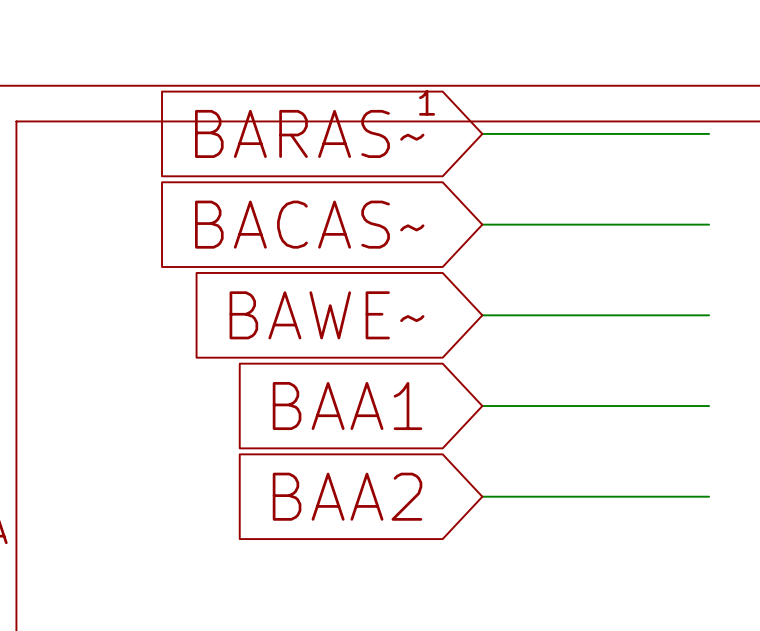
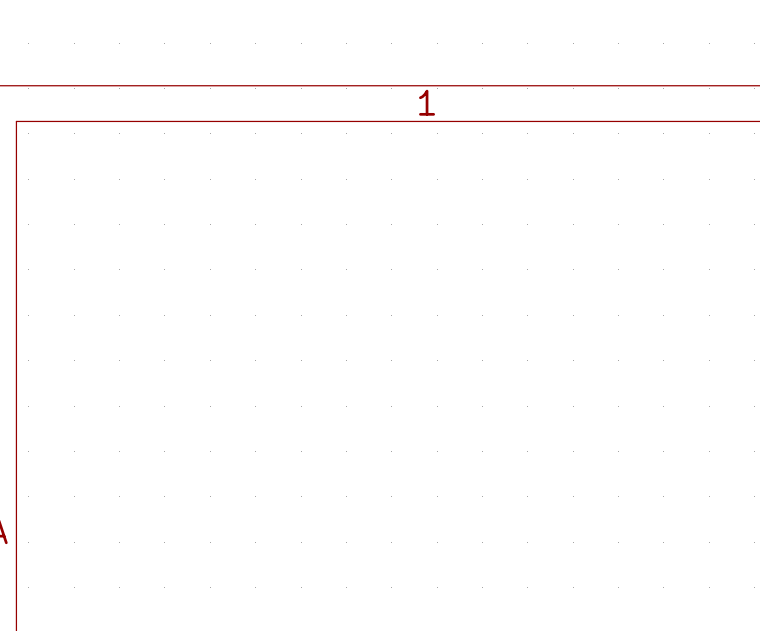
global label: BARAS~ (309, 133) -> none
wire: (482, 133) (709, 133) -> none
global label: BACAS~ (309, 224) -> none
wire: (482, 224) (709, 224) -> none
global label: BAWE~ (327, 315) -> none
wire: (482, 315) (709, 315) -> none
global label: BAA1 (347, 406) -> none
wire: (482, 406) (709, 406) -> none
global label: BAA2 (347, 496) -> none
wire: (482, 496) (709, 496) -> none

